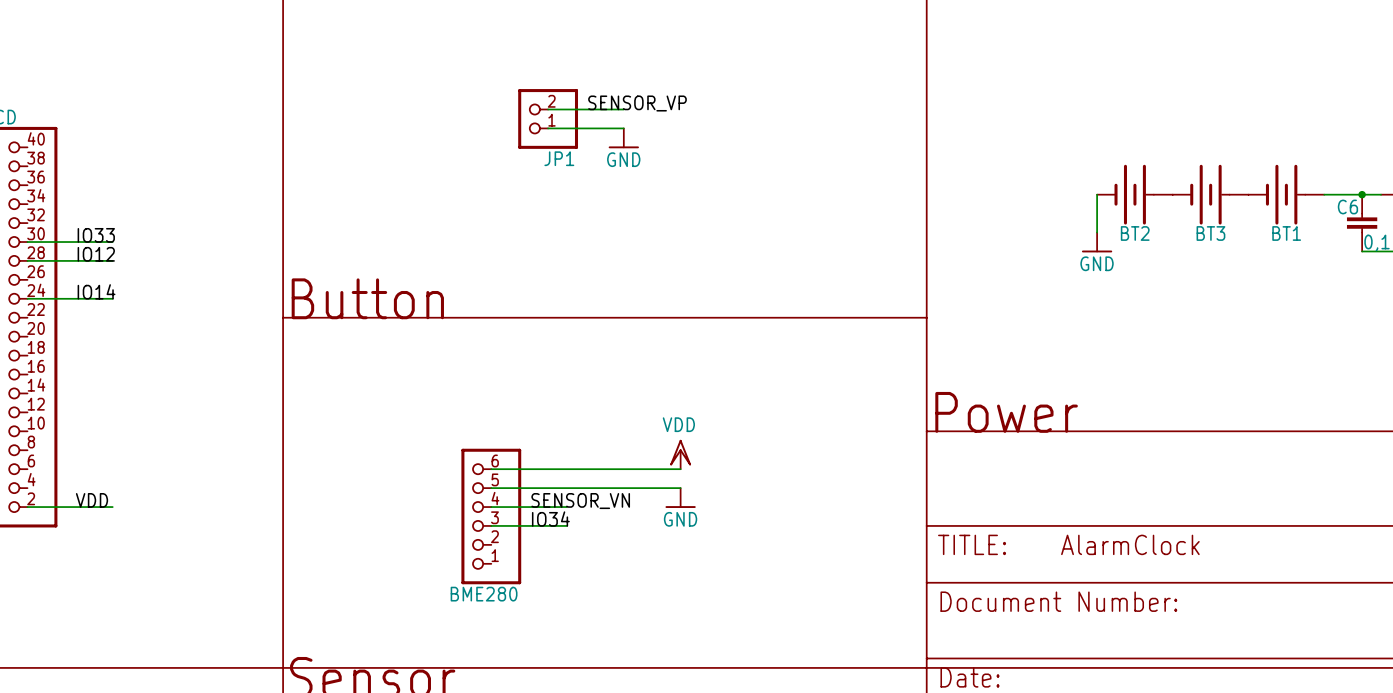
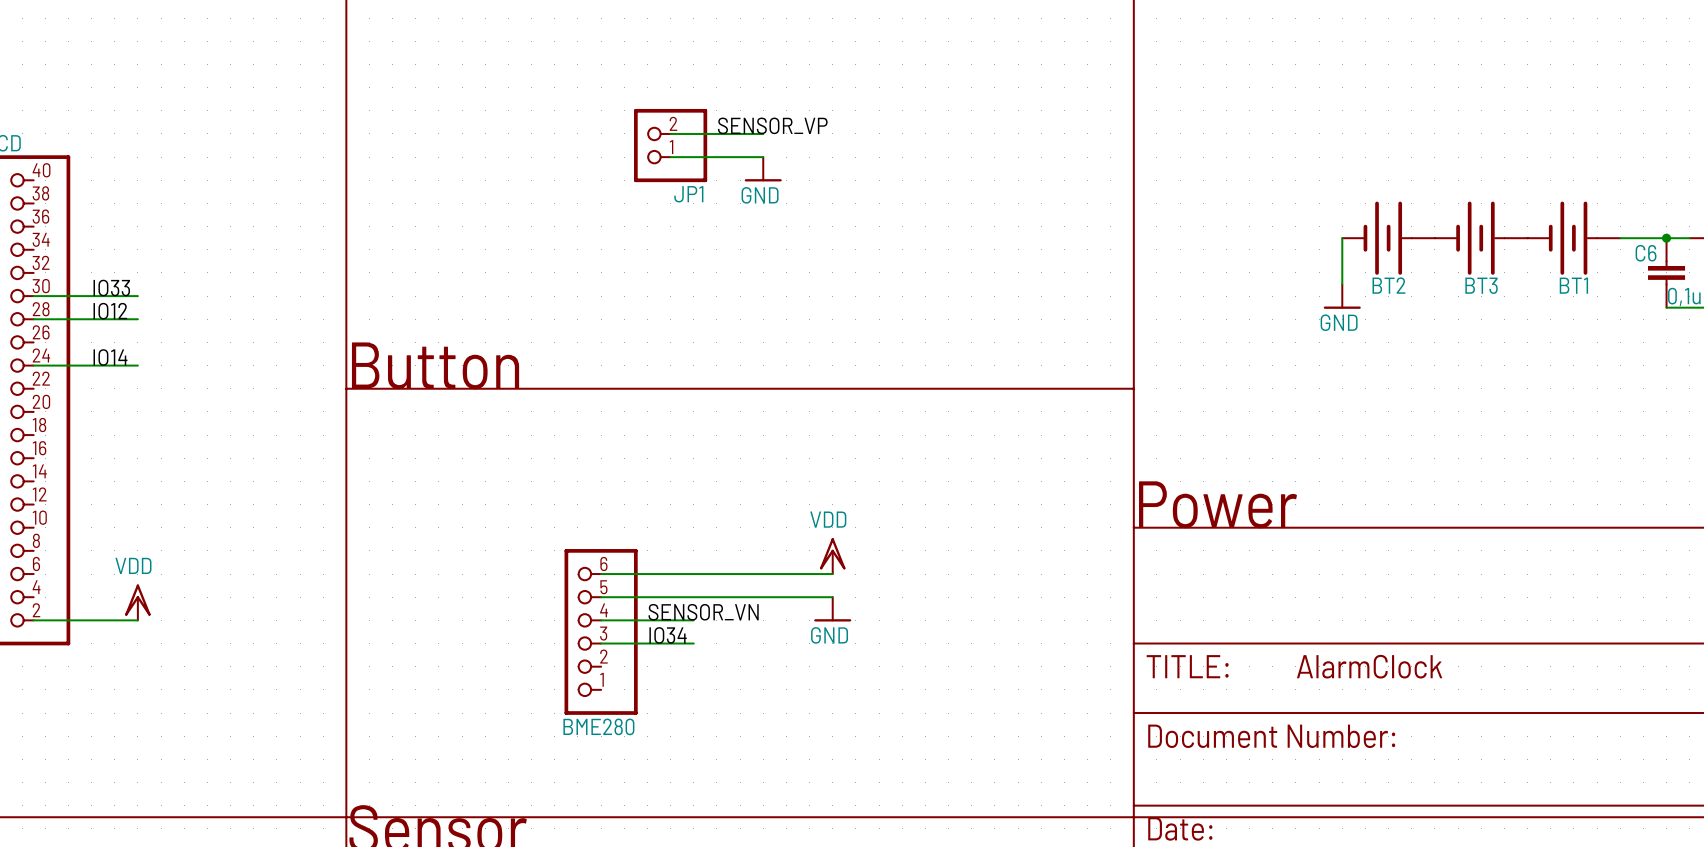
power symbol: none -> VDD (137, 602)
label: VDD (92, 500) -> none

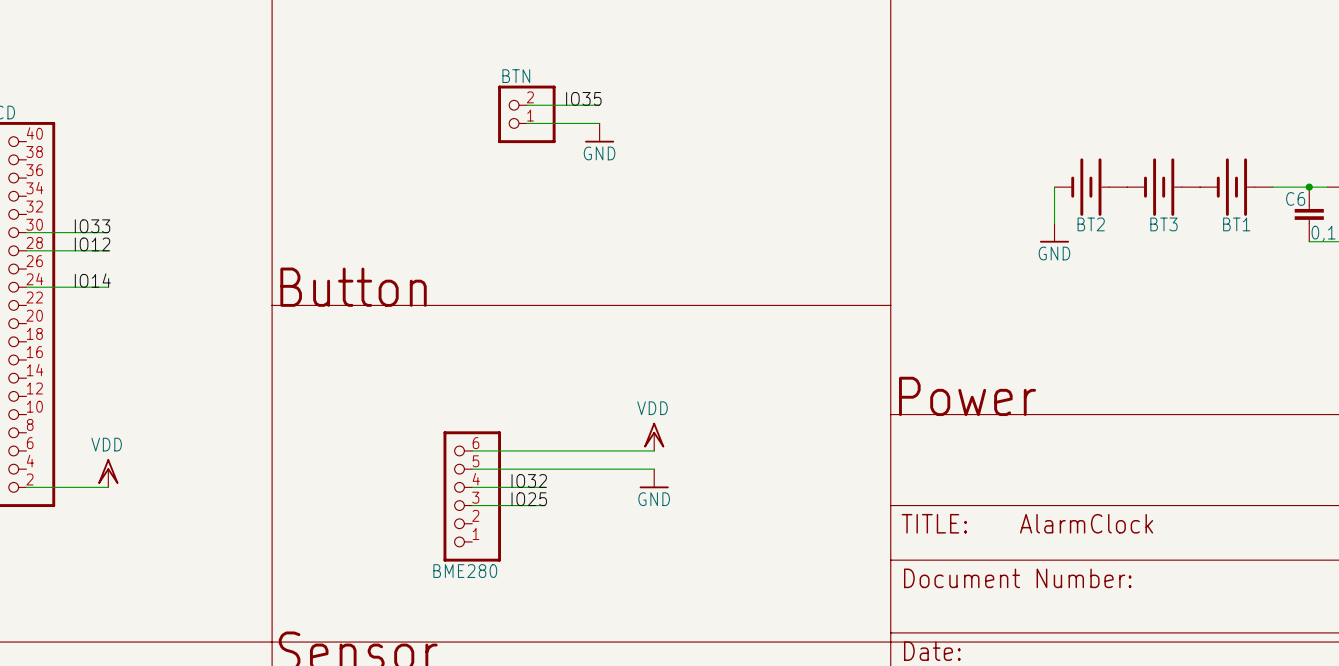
label: SENSOR_VP (772, 125) -> IO35 (583, 98)
JP1 name: JP1 (688, 194) -> BTN (516, 76)
label: SENSOR_VN (703, 612) -> IO32 (529, 480)
label: IO34 (668, 635) -> IO25 (529, 499)

